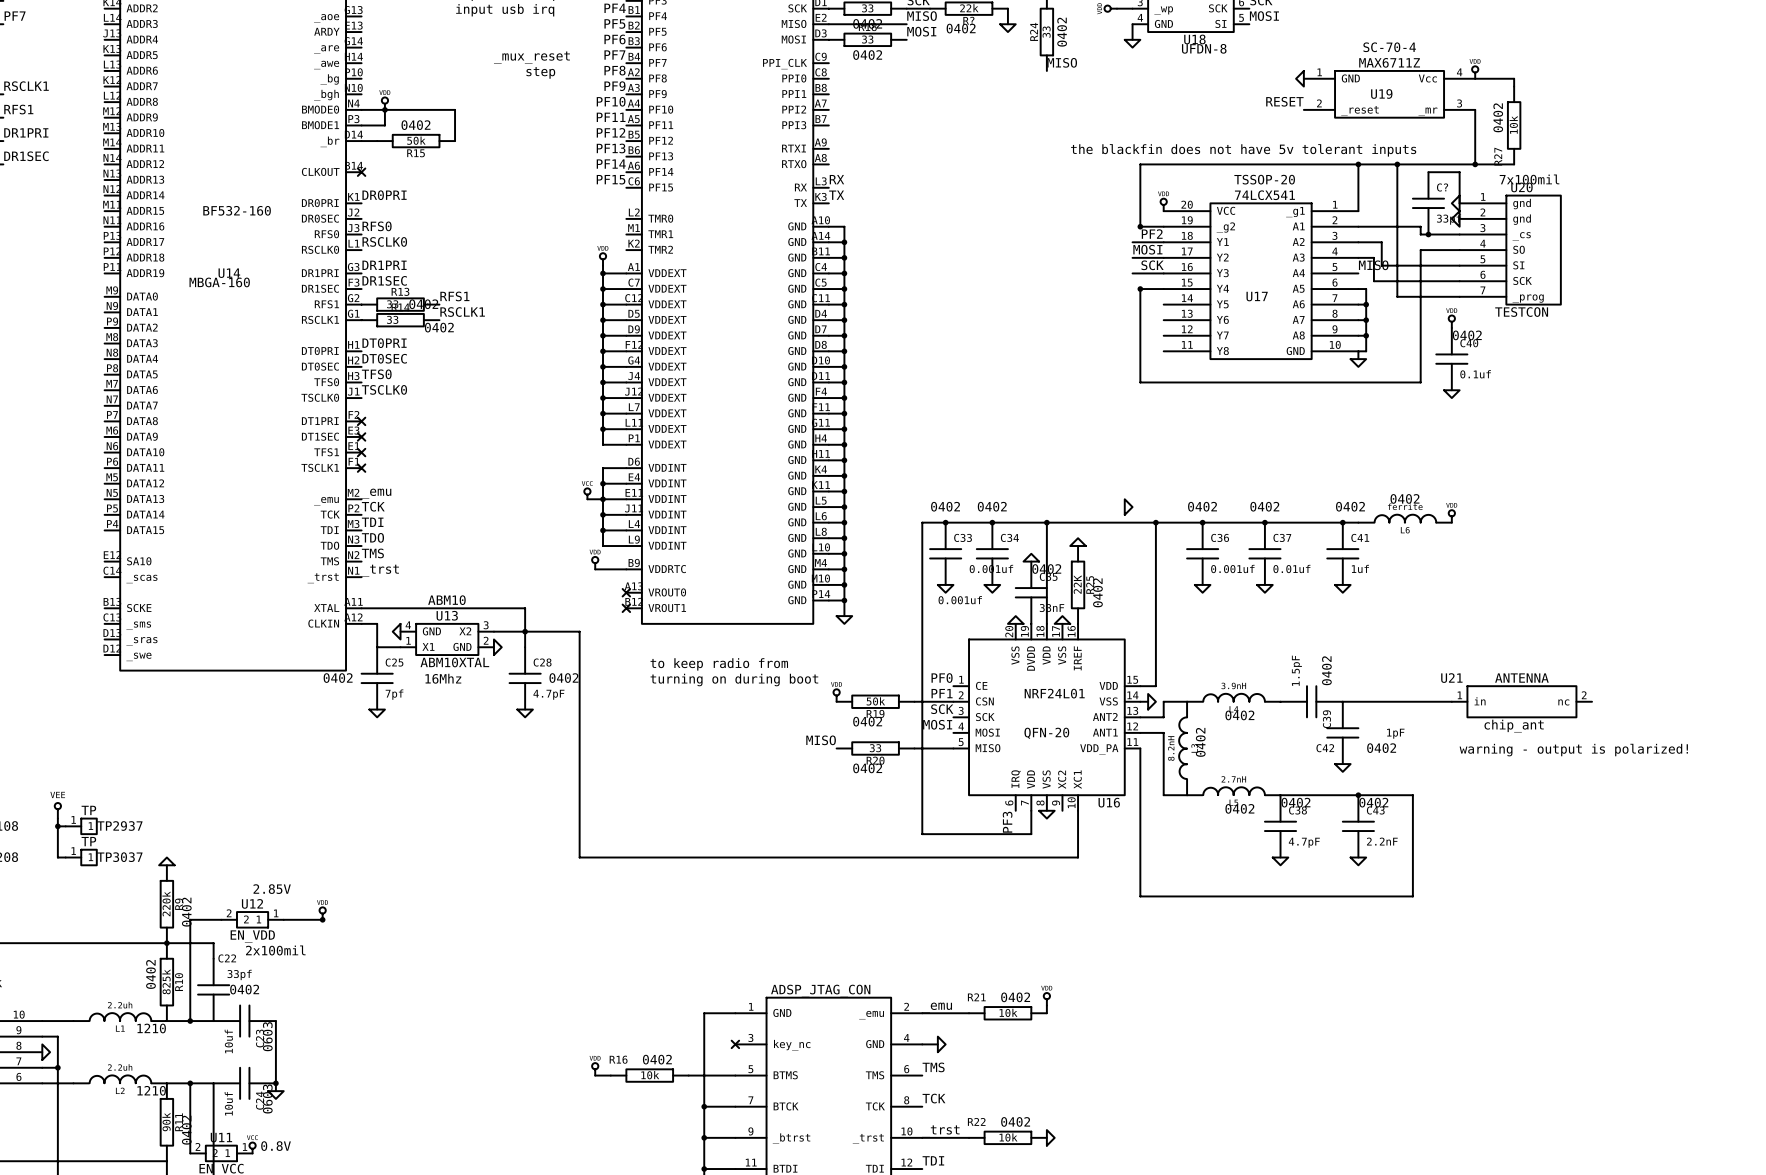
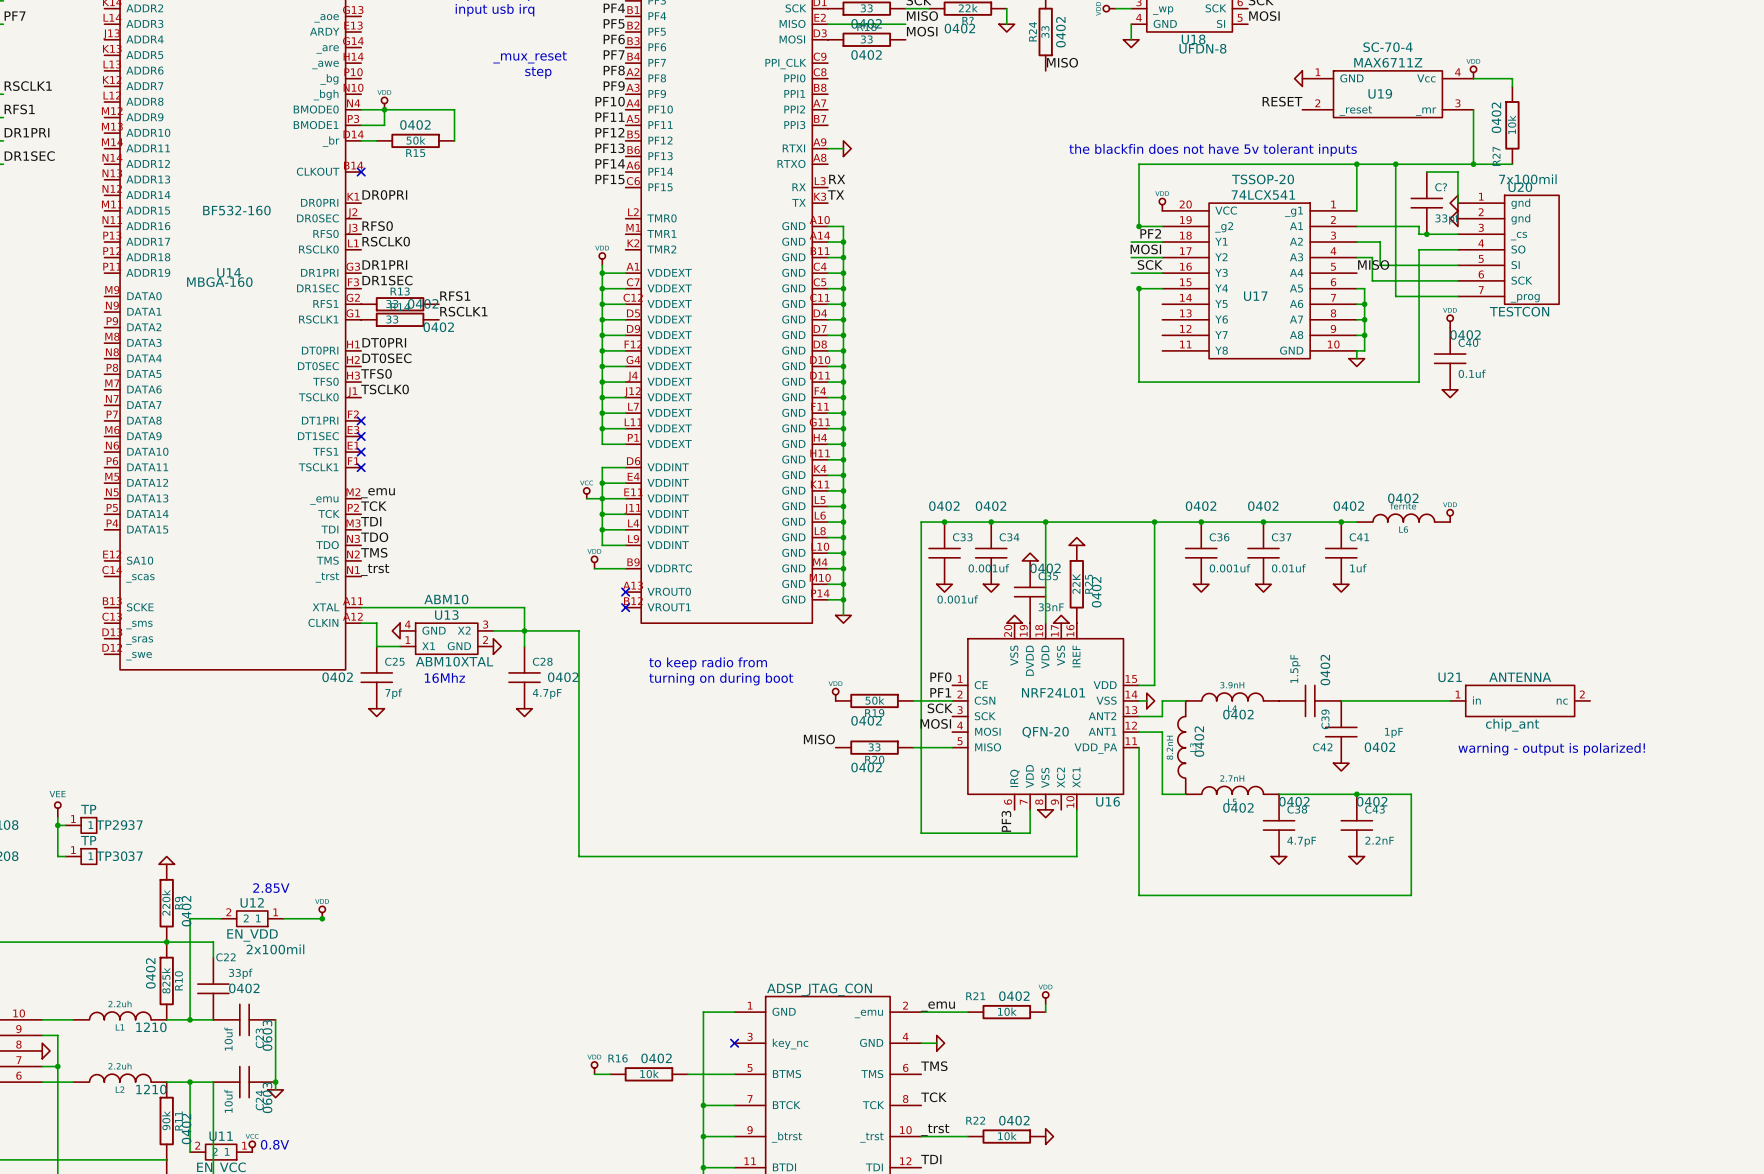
wire: none -> (827, 148) (843, 148)
power symbol: none -> (847, 148)
power symbol: (1128, 507) -> none

